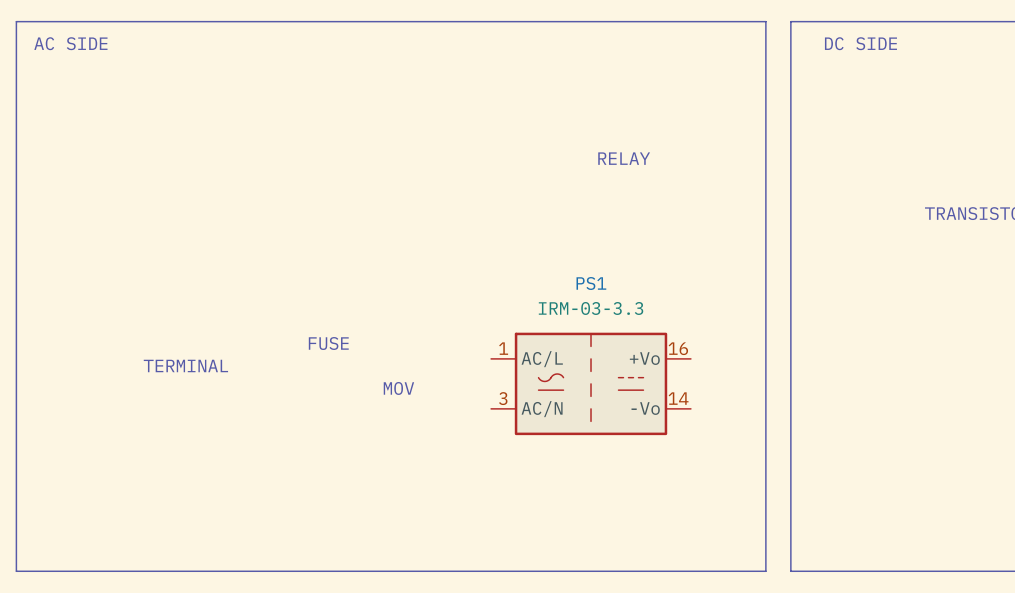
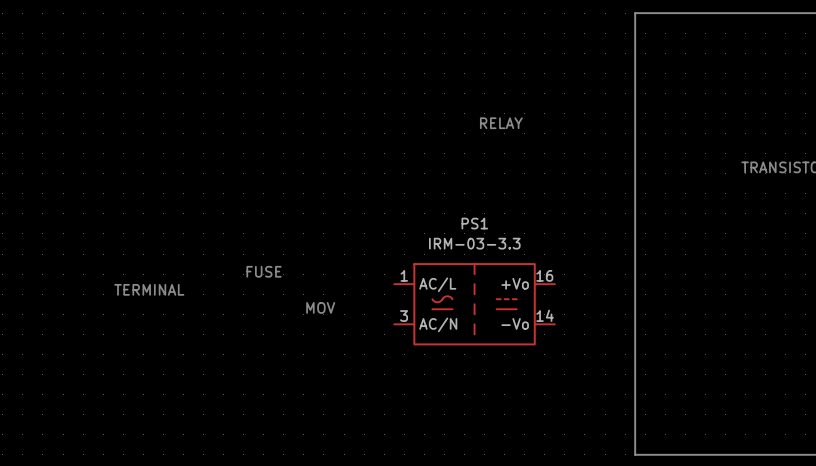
line: (16, 21) (765, 21) (765, 571) (16, 571) (16, 21) -> none
text: AC SIDE (70, 43) -> none
text: DC SIDE (860, 43) -> none

